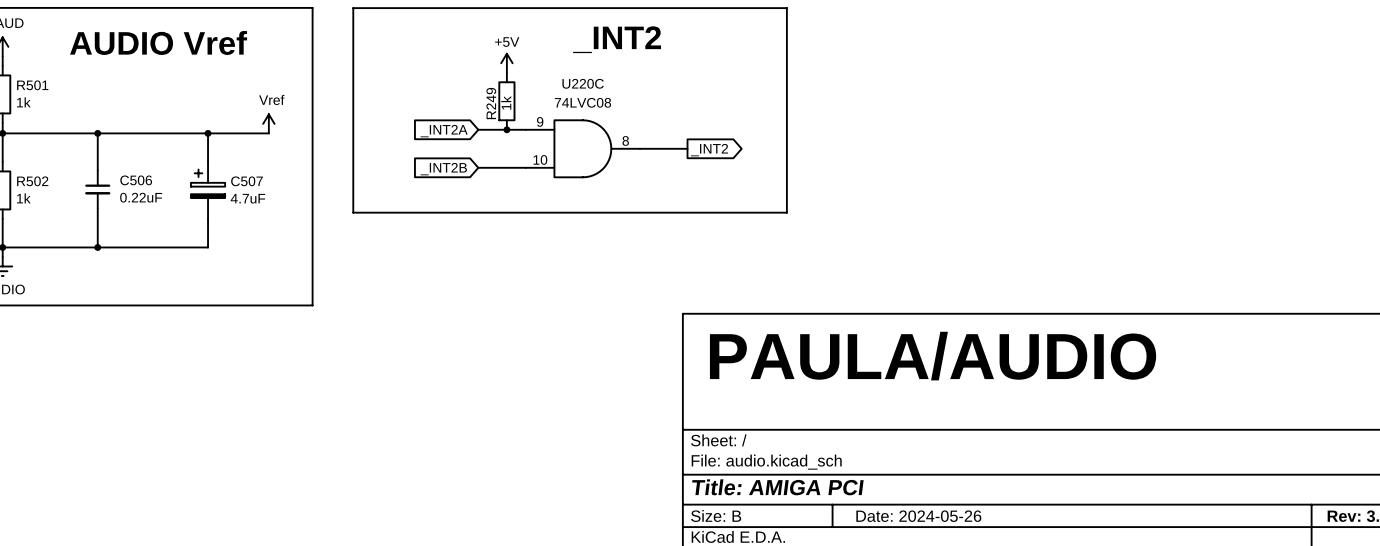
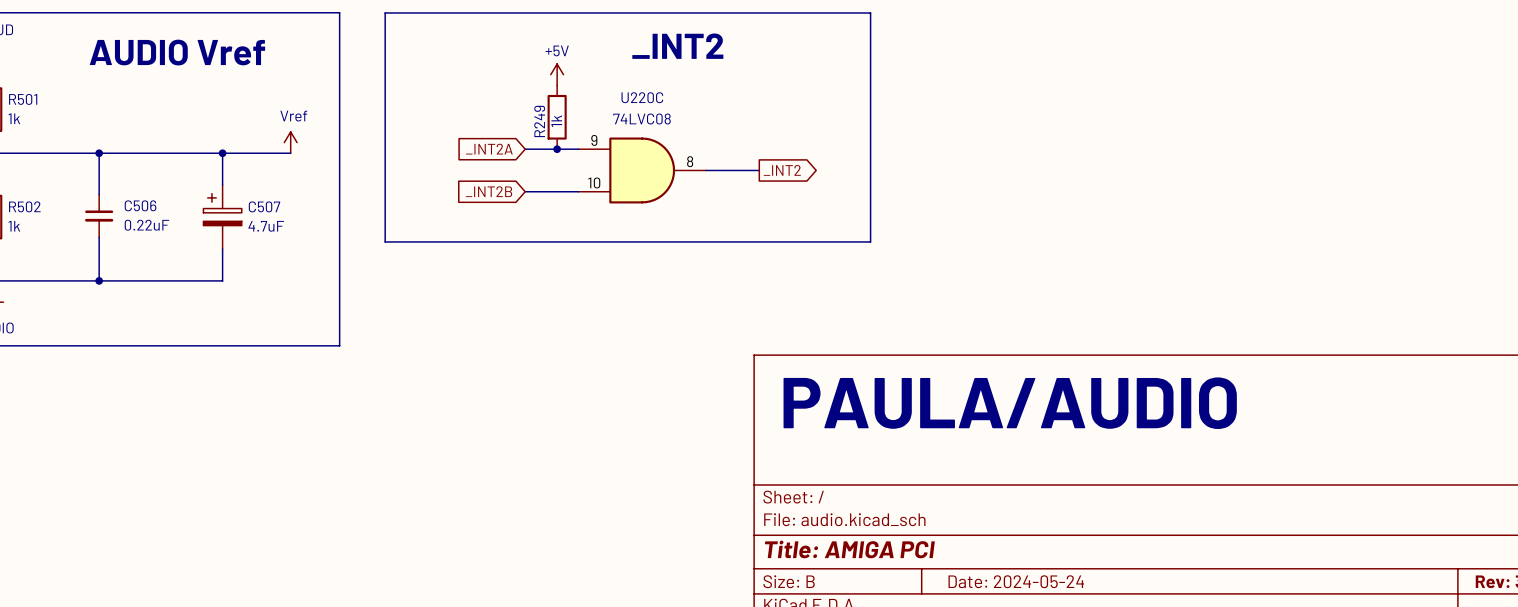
title block: Date: 2024-05-26 (918, 516) -> Date: 2024-05-24 (1016, 581)

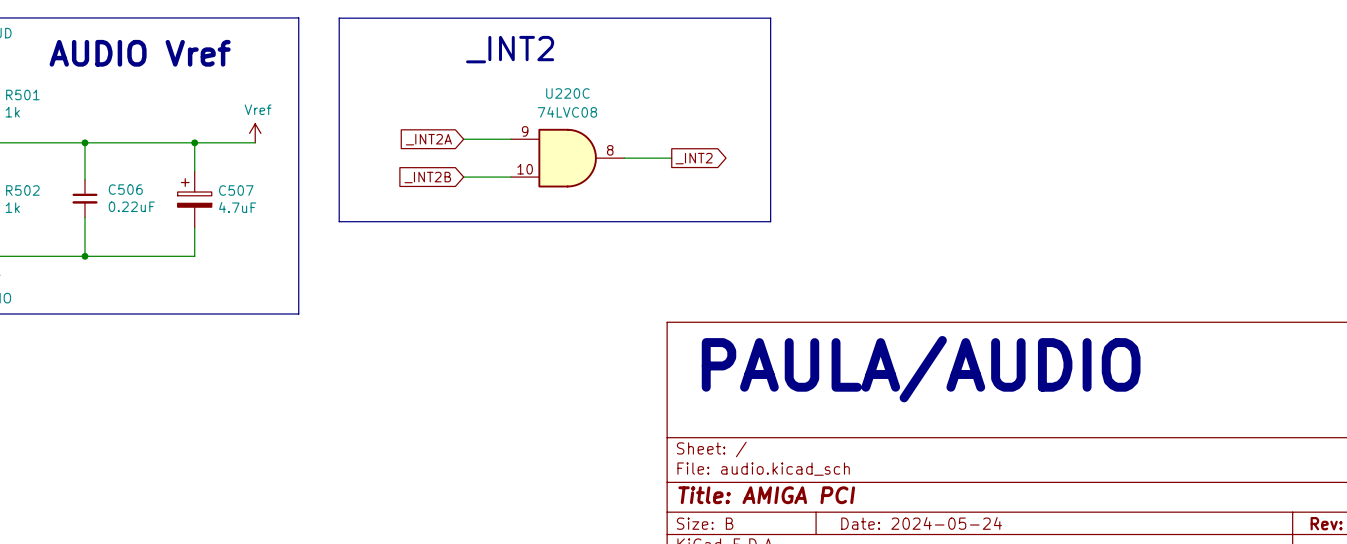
text position: _INT2 (677, 46) -> _INT2 (510, 49)
power symbol: +5V (557, 74) -> none
R249: 1k (557, 117) -> none
junction: (557, 149) -> none

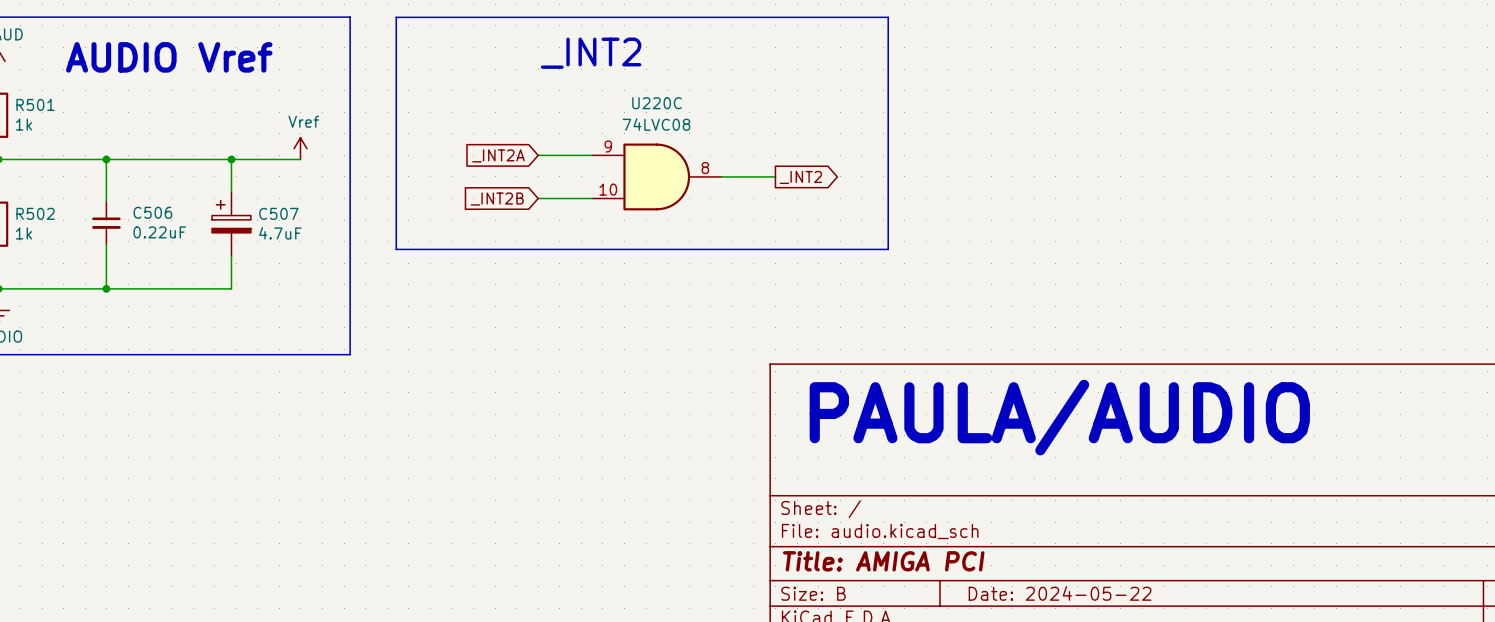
title block: Date: 2024-05-24 (921, 523) -> Date: 2024-05-22 (1060, 593)

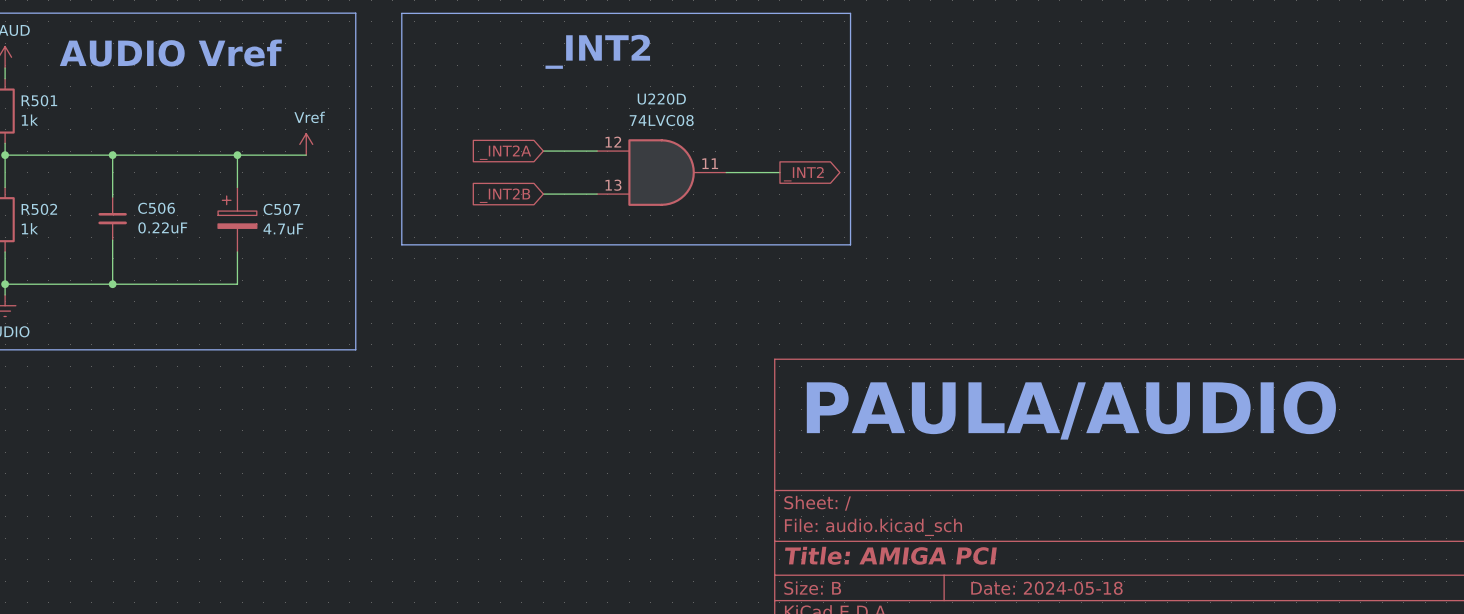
line: (846, 17) (888, 17) (888, 249) (846, 249) -> (850, 13) (850, 244)
U220C name: U220C (657, 103) -> U220D (661, 99)
U220C pin number: 9 (608, 146) -> 12 (613, 142)
U220C pin number: 8 (705, 168) -> 11 (710, 163)
U220C pin number: 10 (608, 189) -> 13 (613, 185)
title block: Date: 2024-05-22 (1060, 593) -> Date: 2024-05-18 (1046, 588)

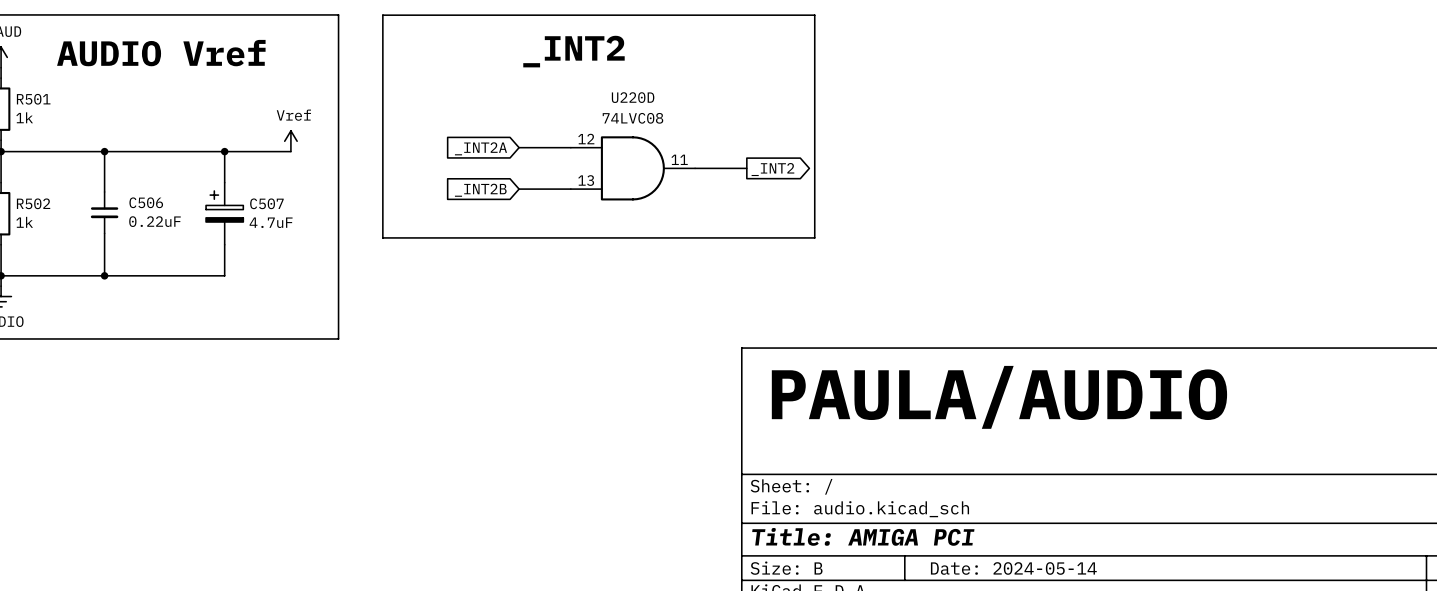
title block: Date: 2024-05-18 (1046, 588) -> Date: 2024-05-14 (1013, 568)

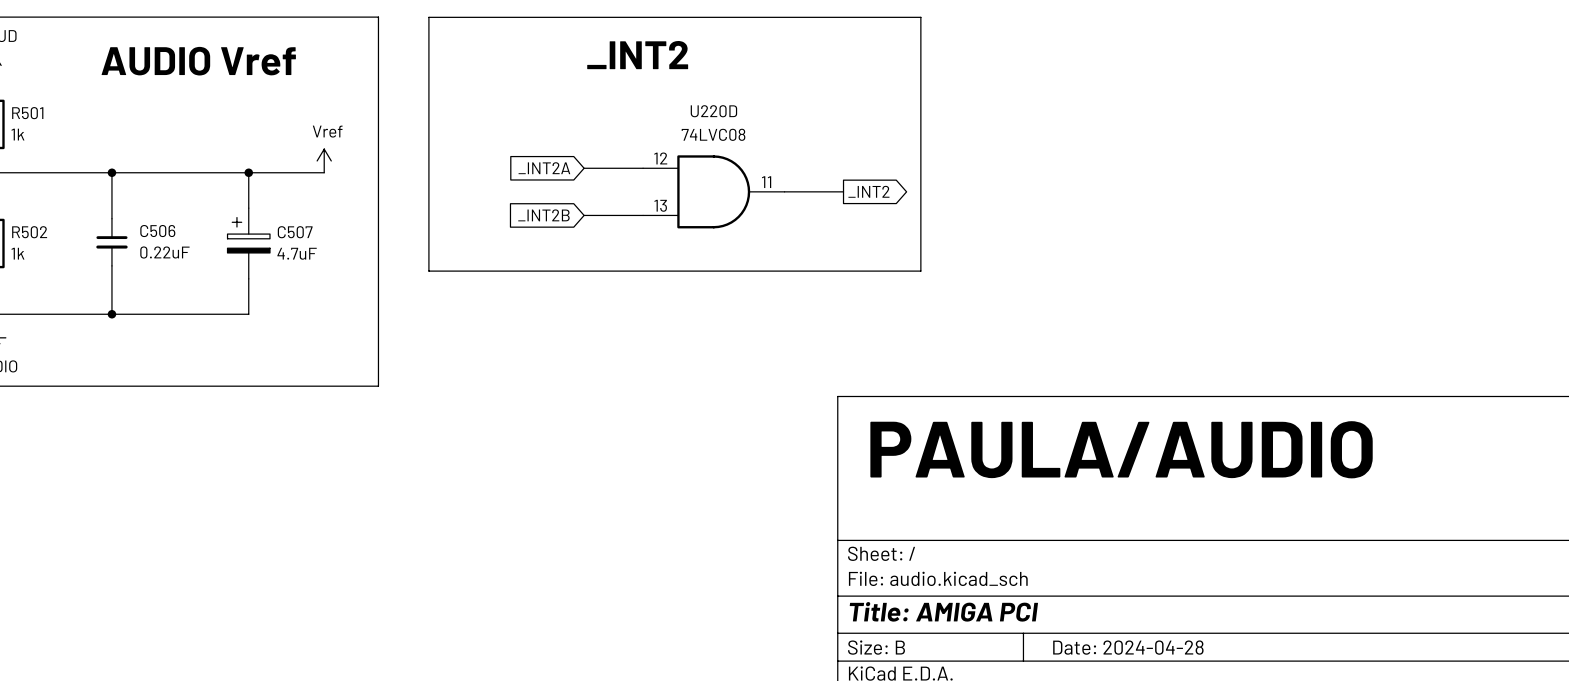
title block: Date: 2024-05-14 (1013, 568) -> Date: 2024-04-28 (1128, 647)

